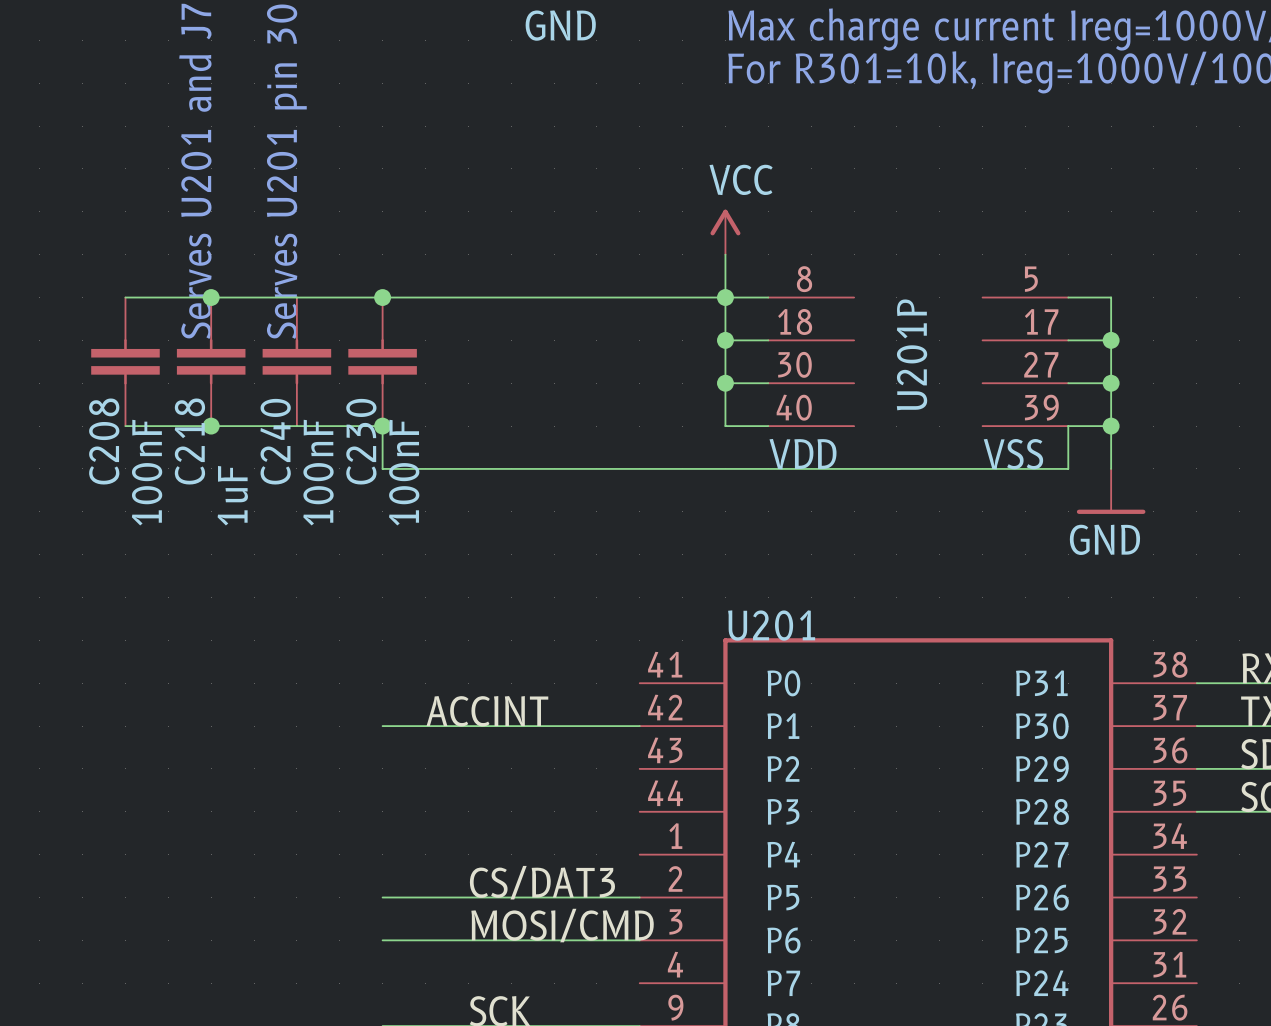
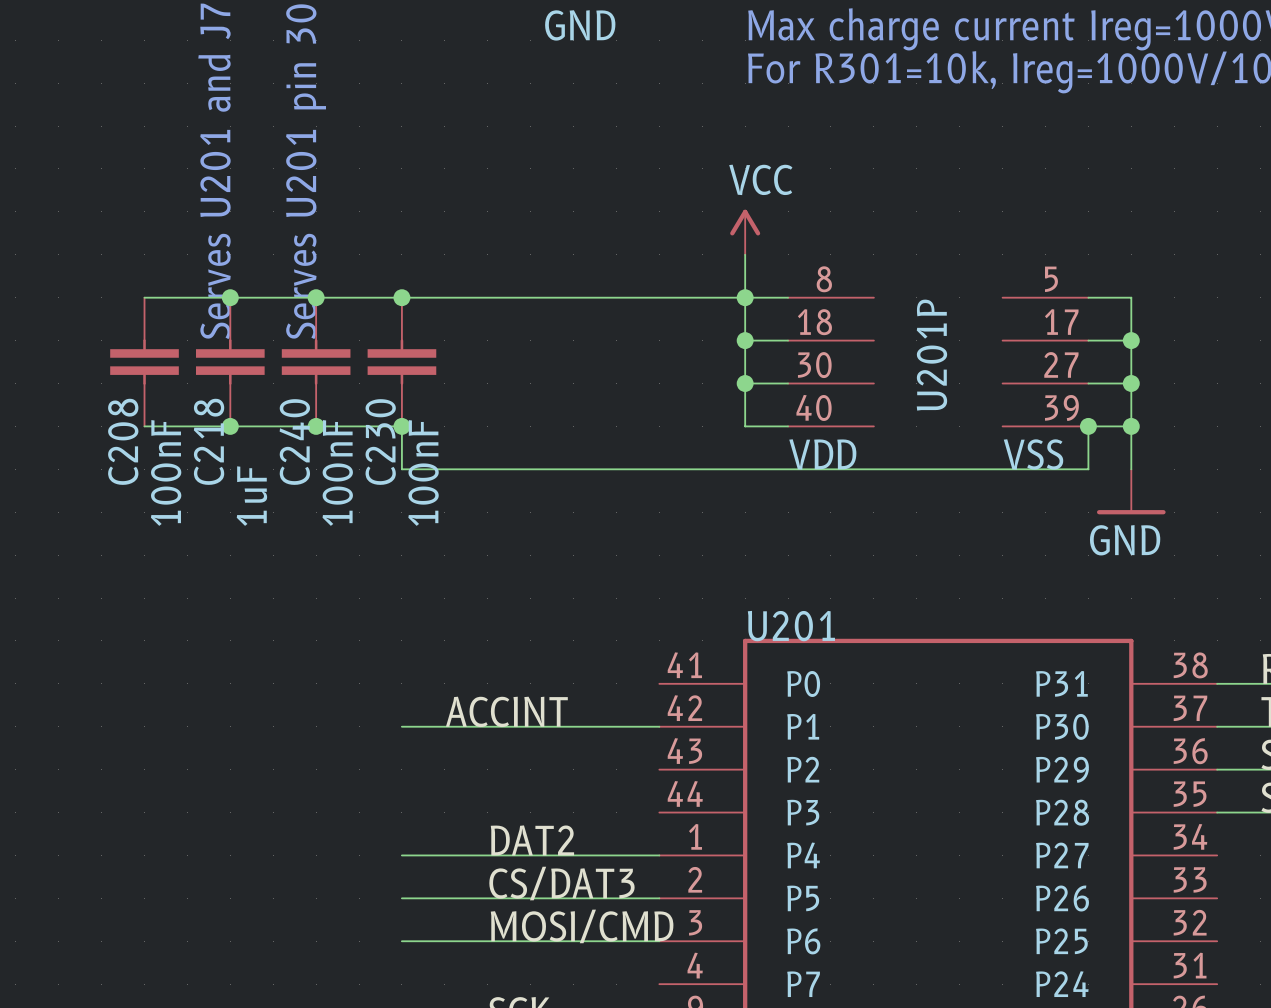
junction: none -> (316, 297)
junction: none -> (316, 426)
junction: none -> (1088, 426)
label: none -> DAT2 (532, 840)
wire: none -> (401, 855) (659, 855)

